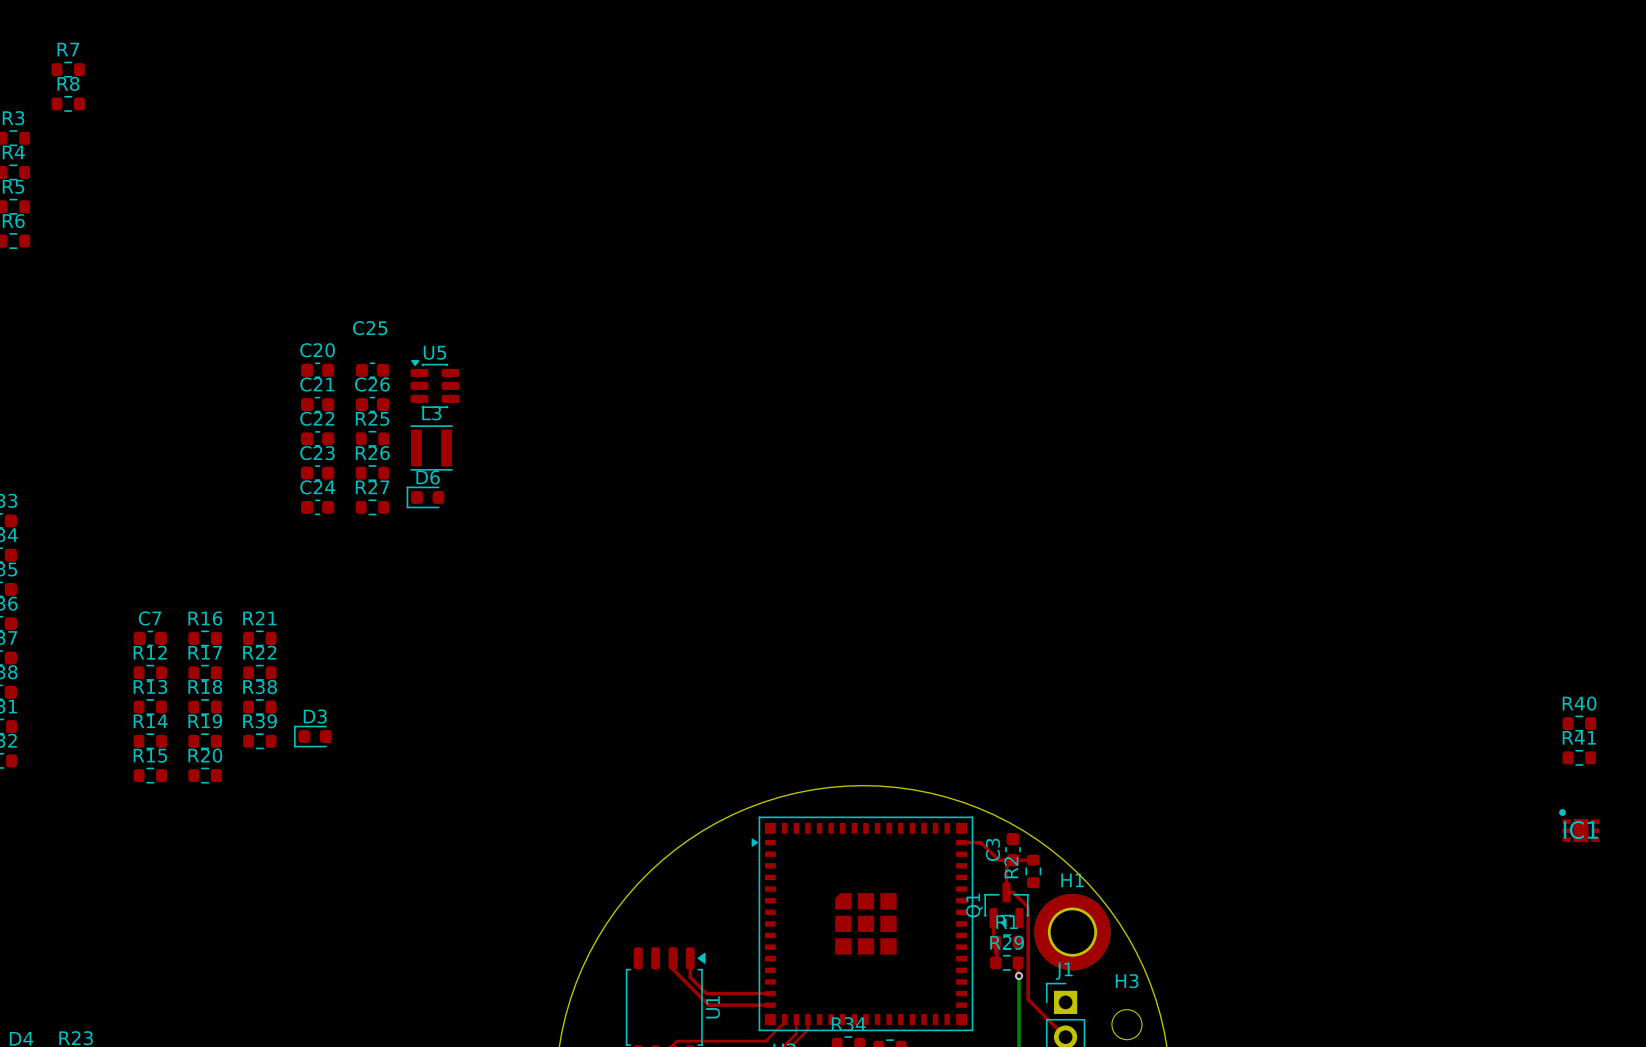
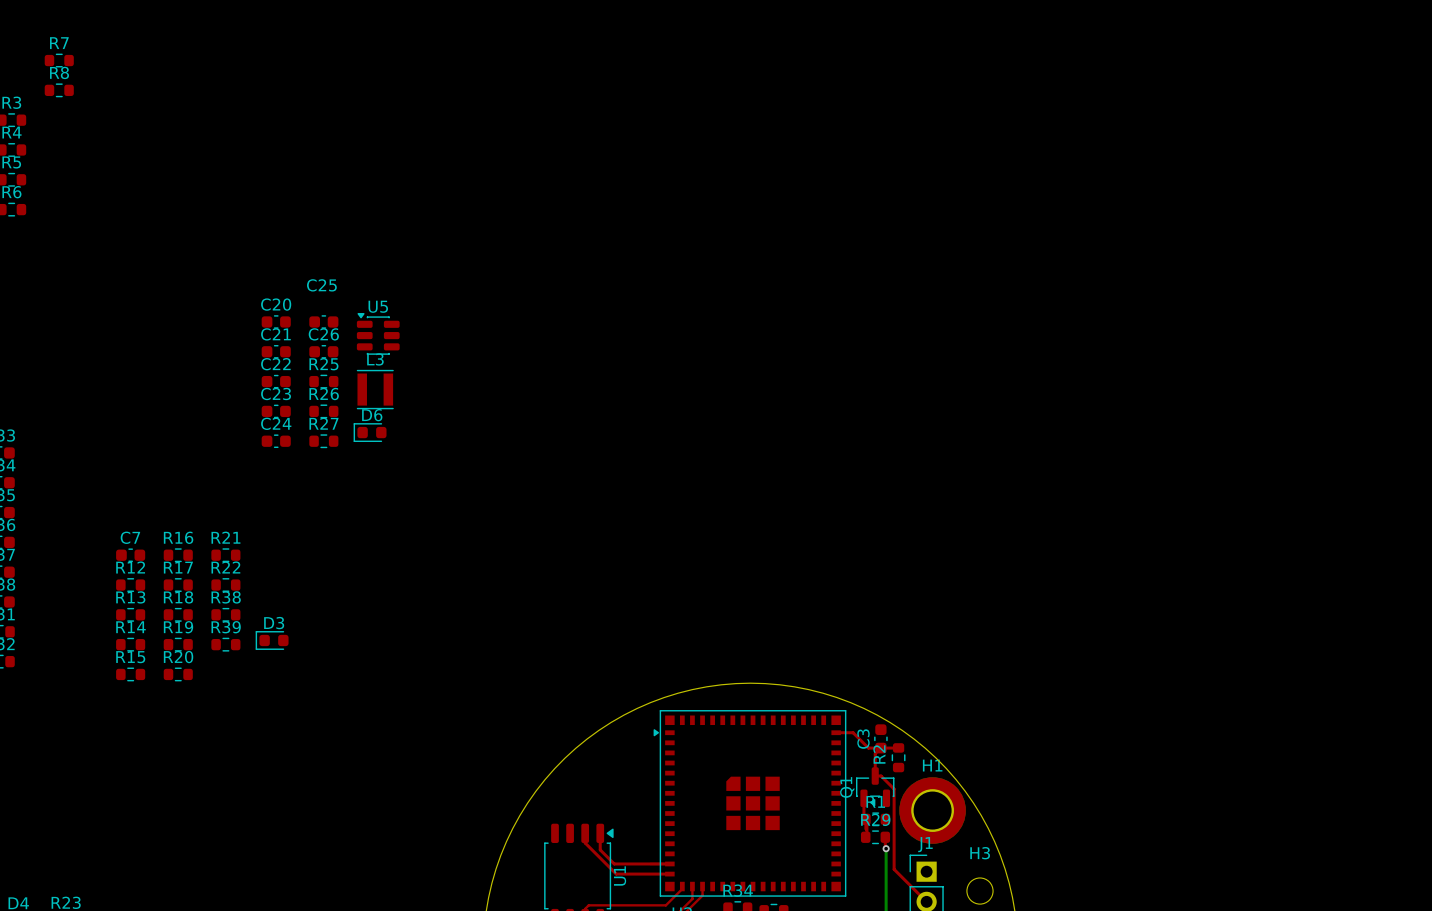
R40: (1579, 723) -> none
R41: (1579, 757) -> none
IC1: (1579, 825) -> none

